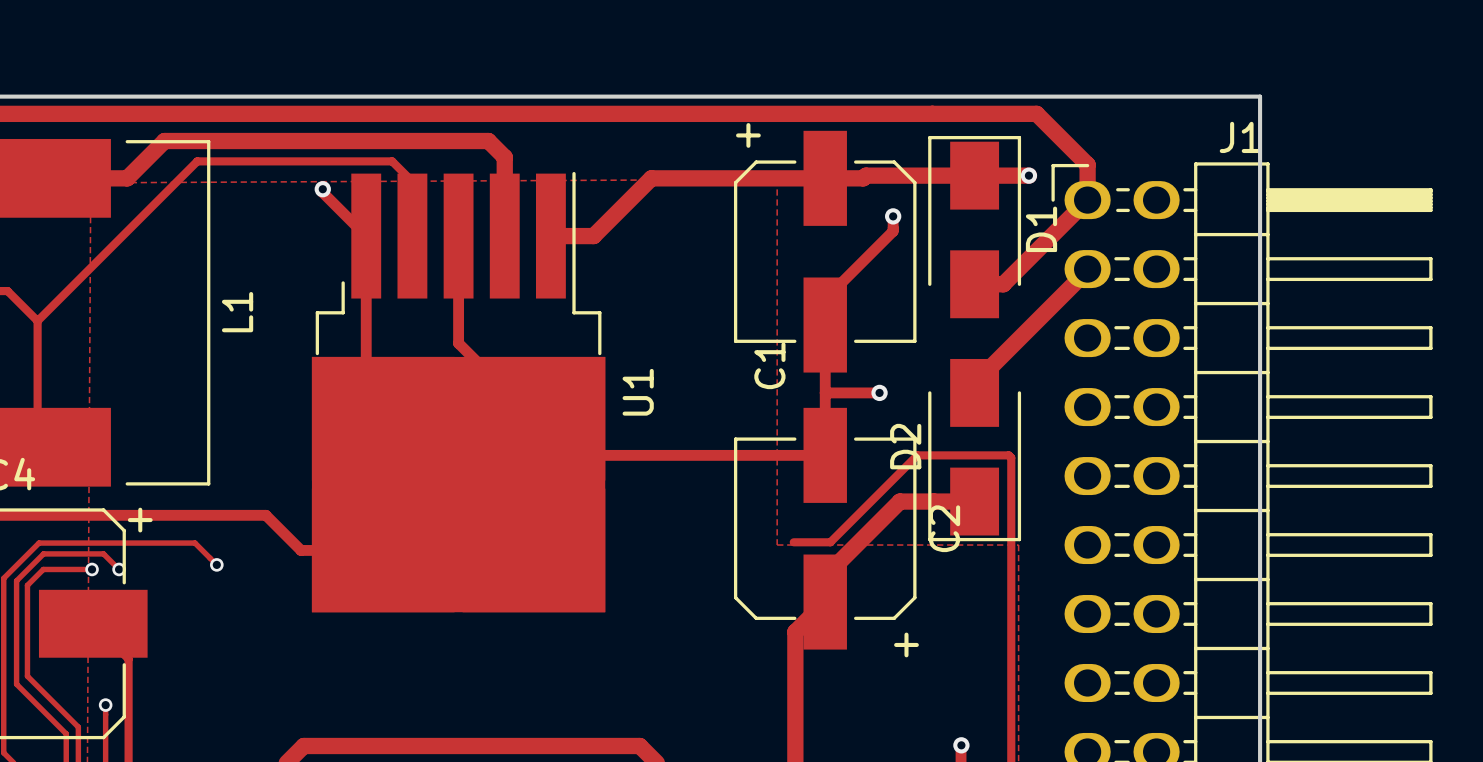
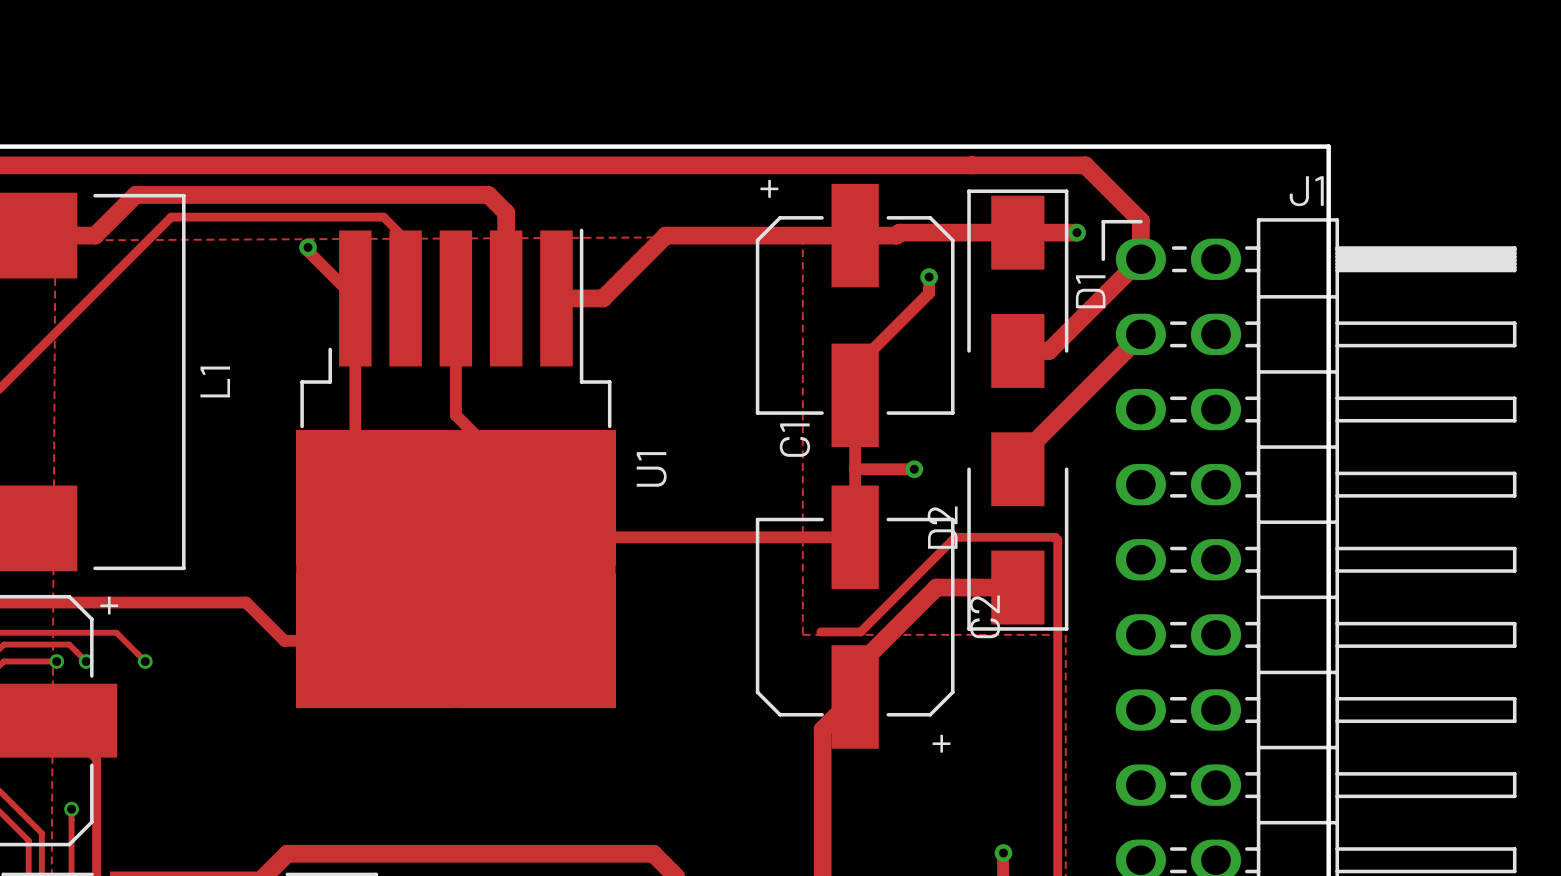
track: (146, 543) (194, 543) (216, 564) -> (116, 632) (145, 661)
via position: (216, 564) -> (145, 661)

